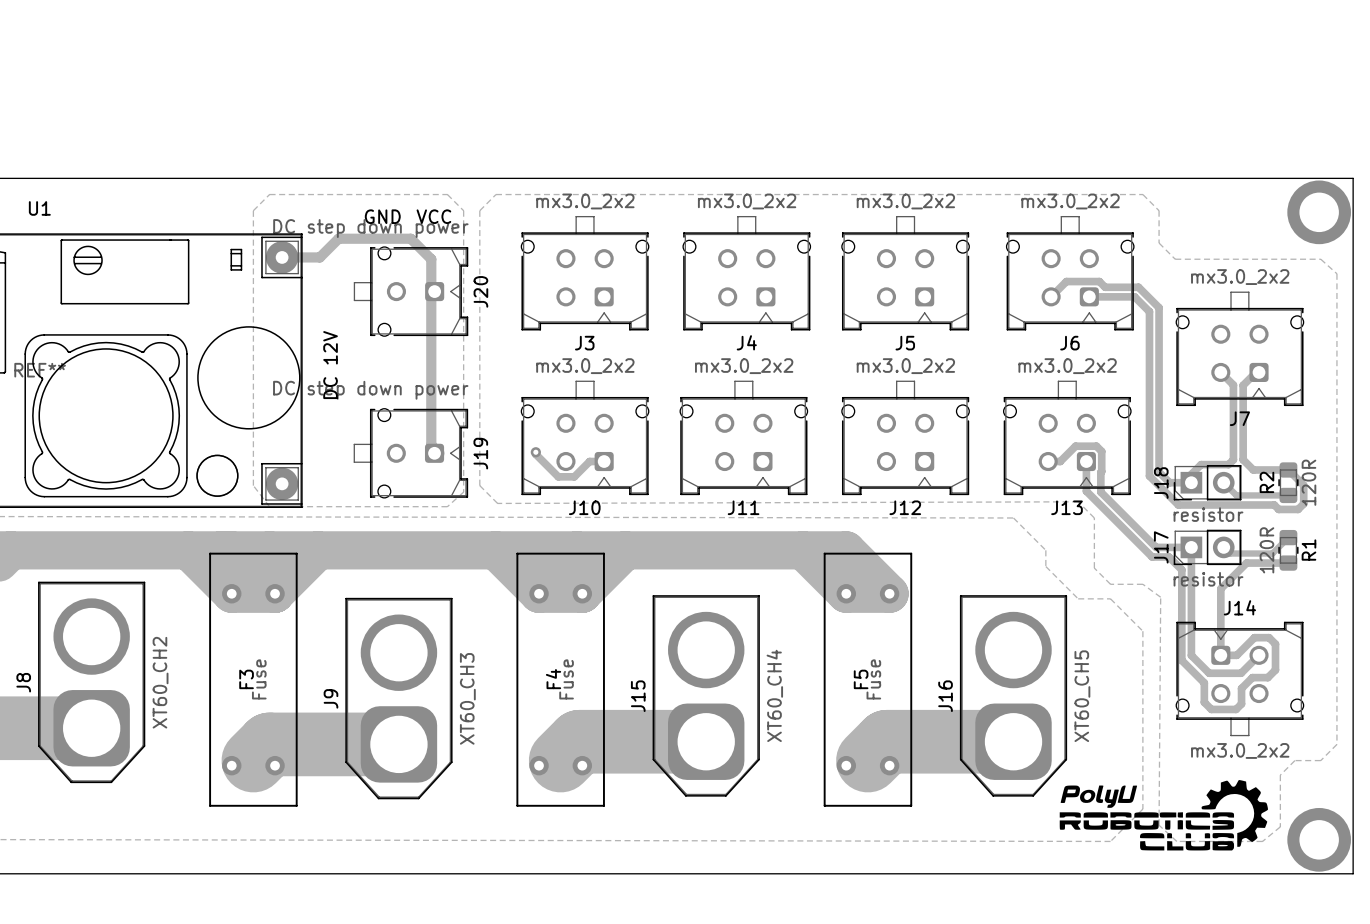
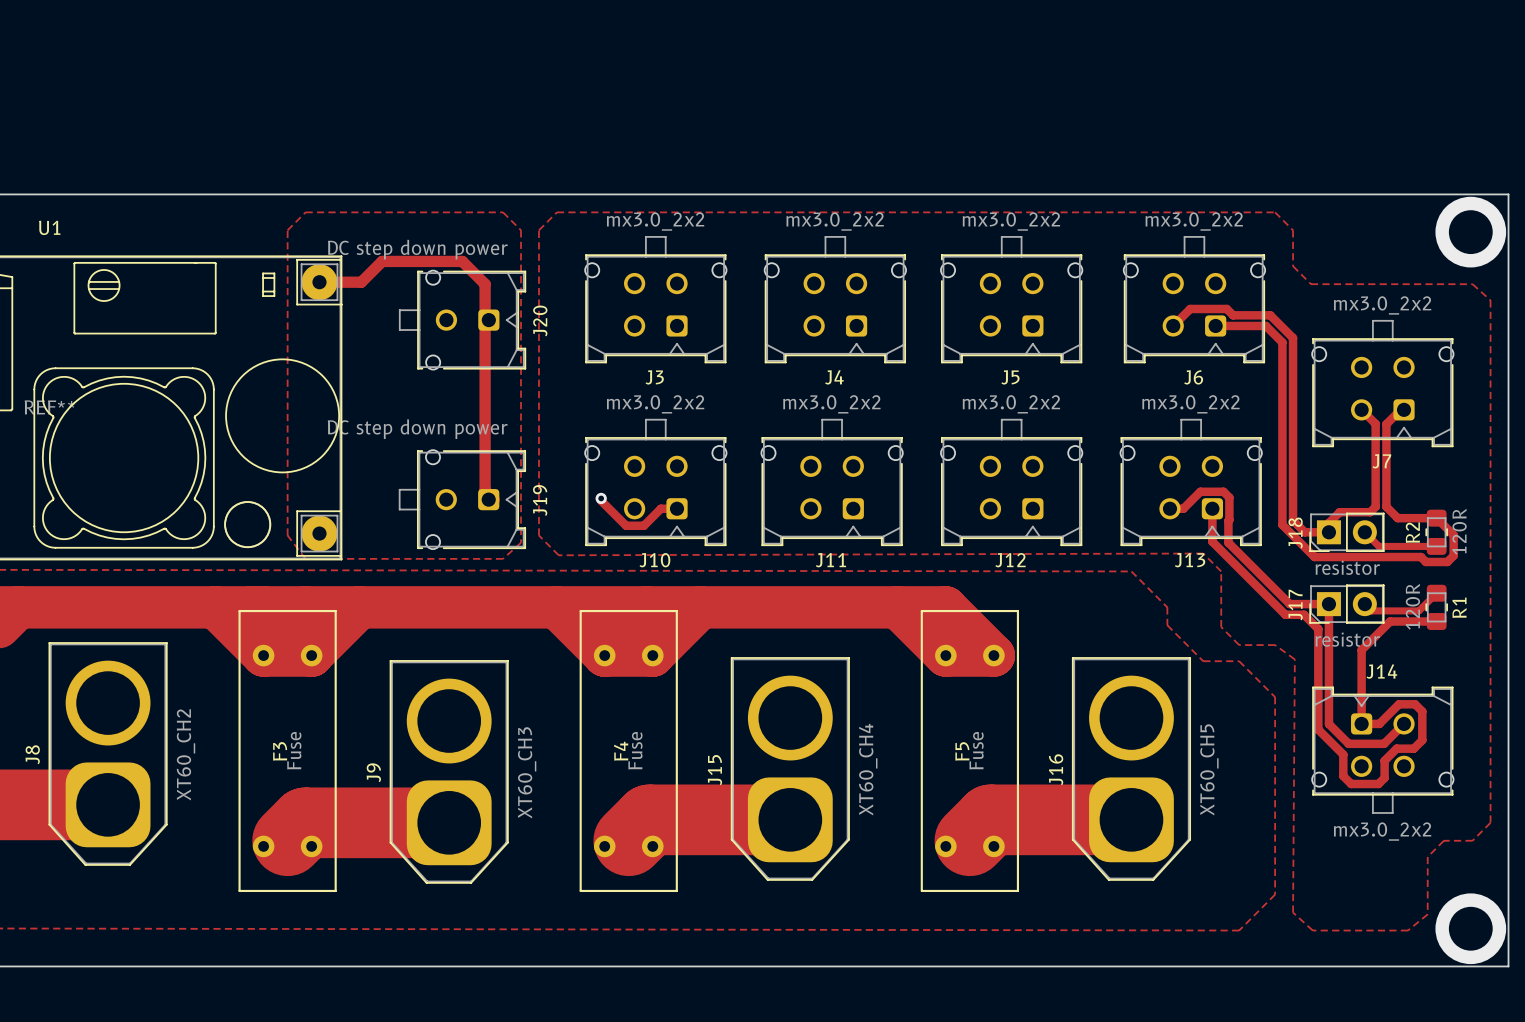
text: GND (382, 216) -> none
text: VCC (433, 216) -> none
text: DC 12V (330, 365) -> none
drawing: [1059, 780, 1268, 851] -> none

